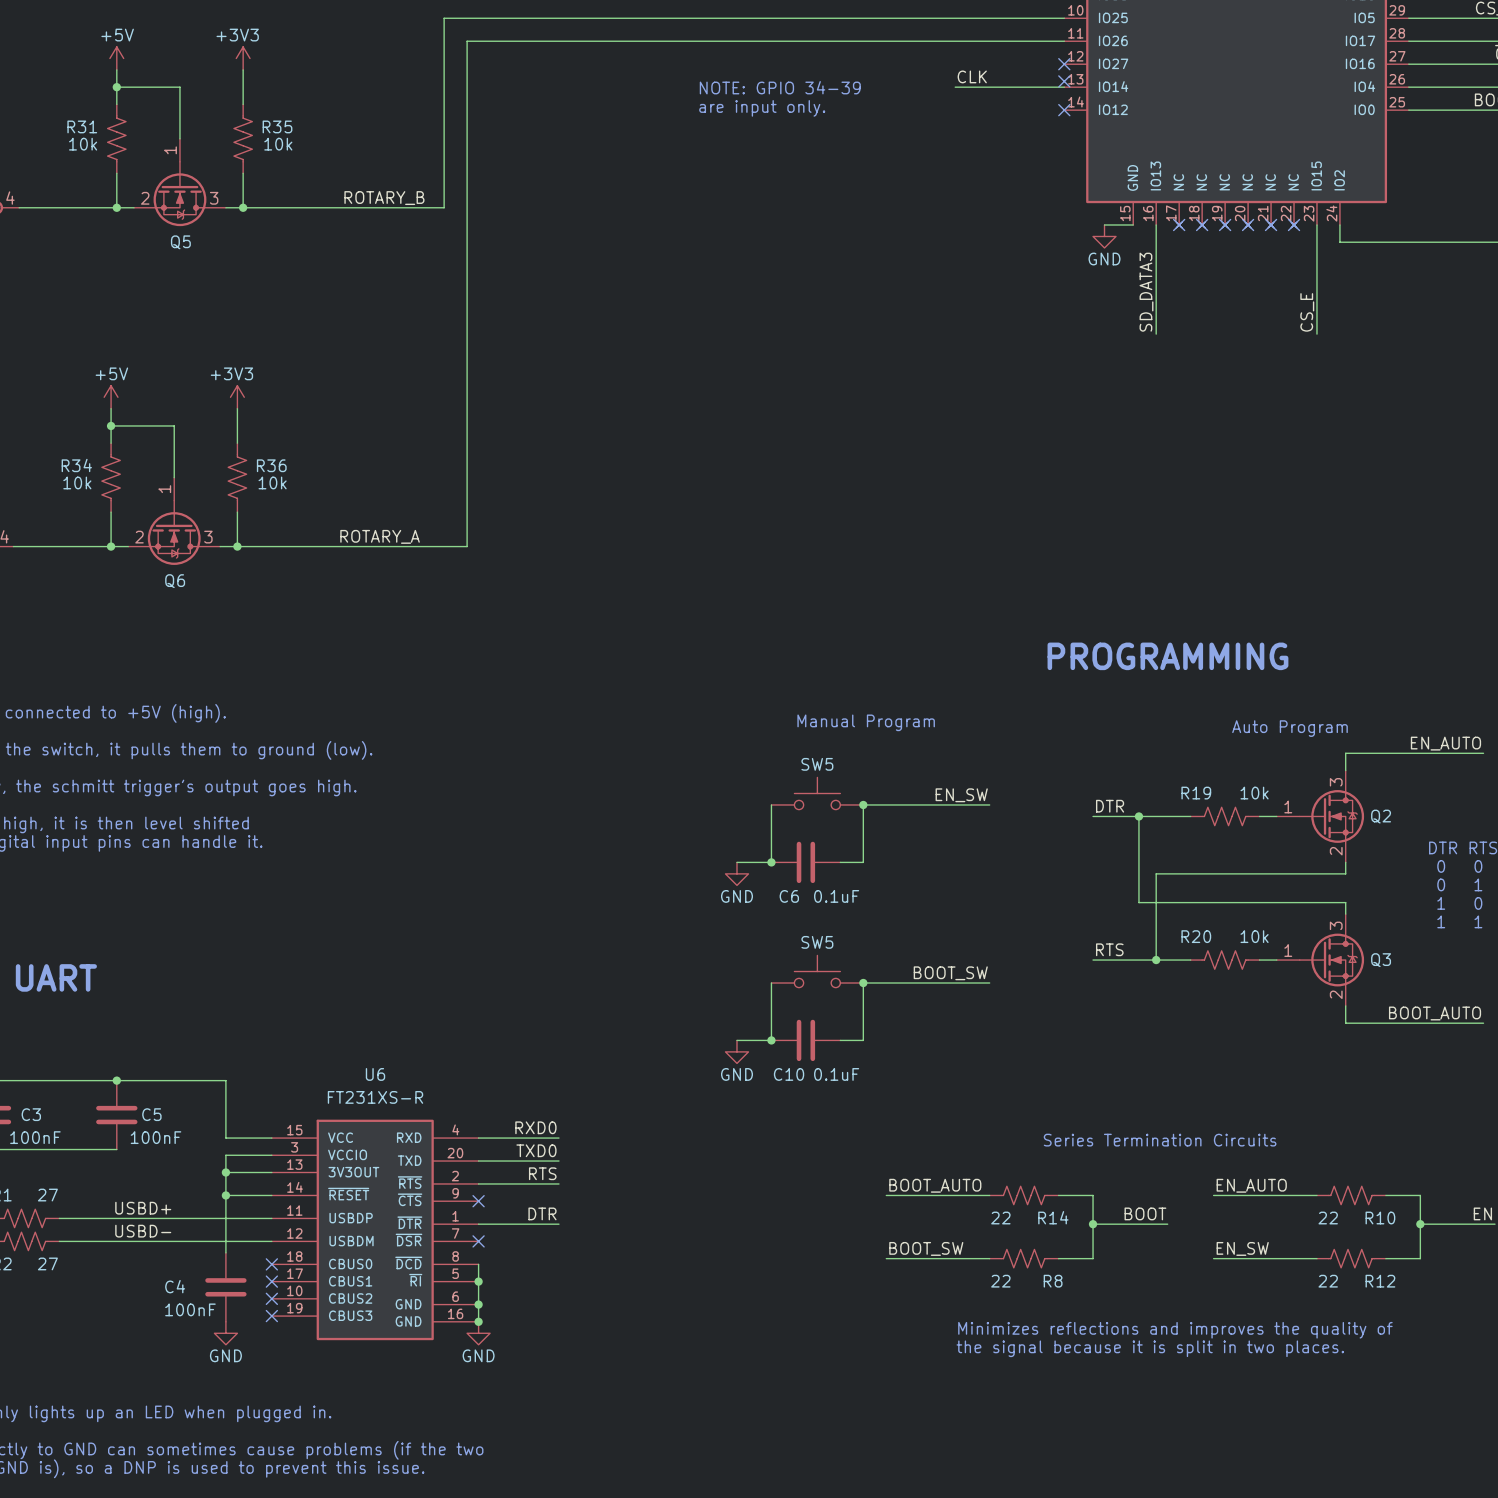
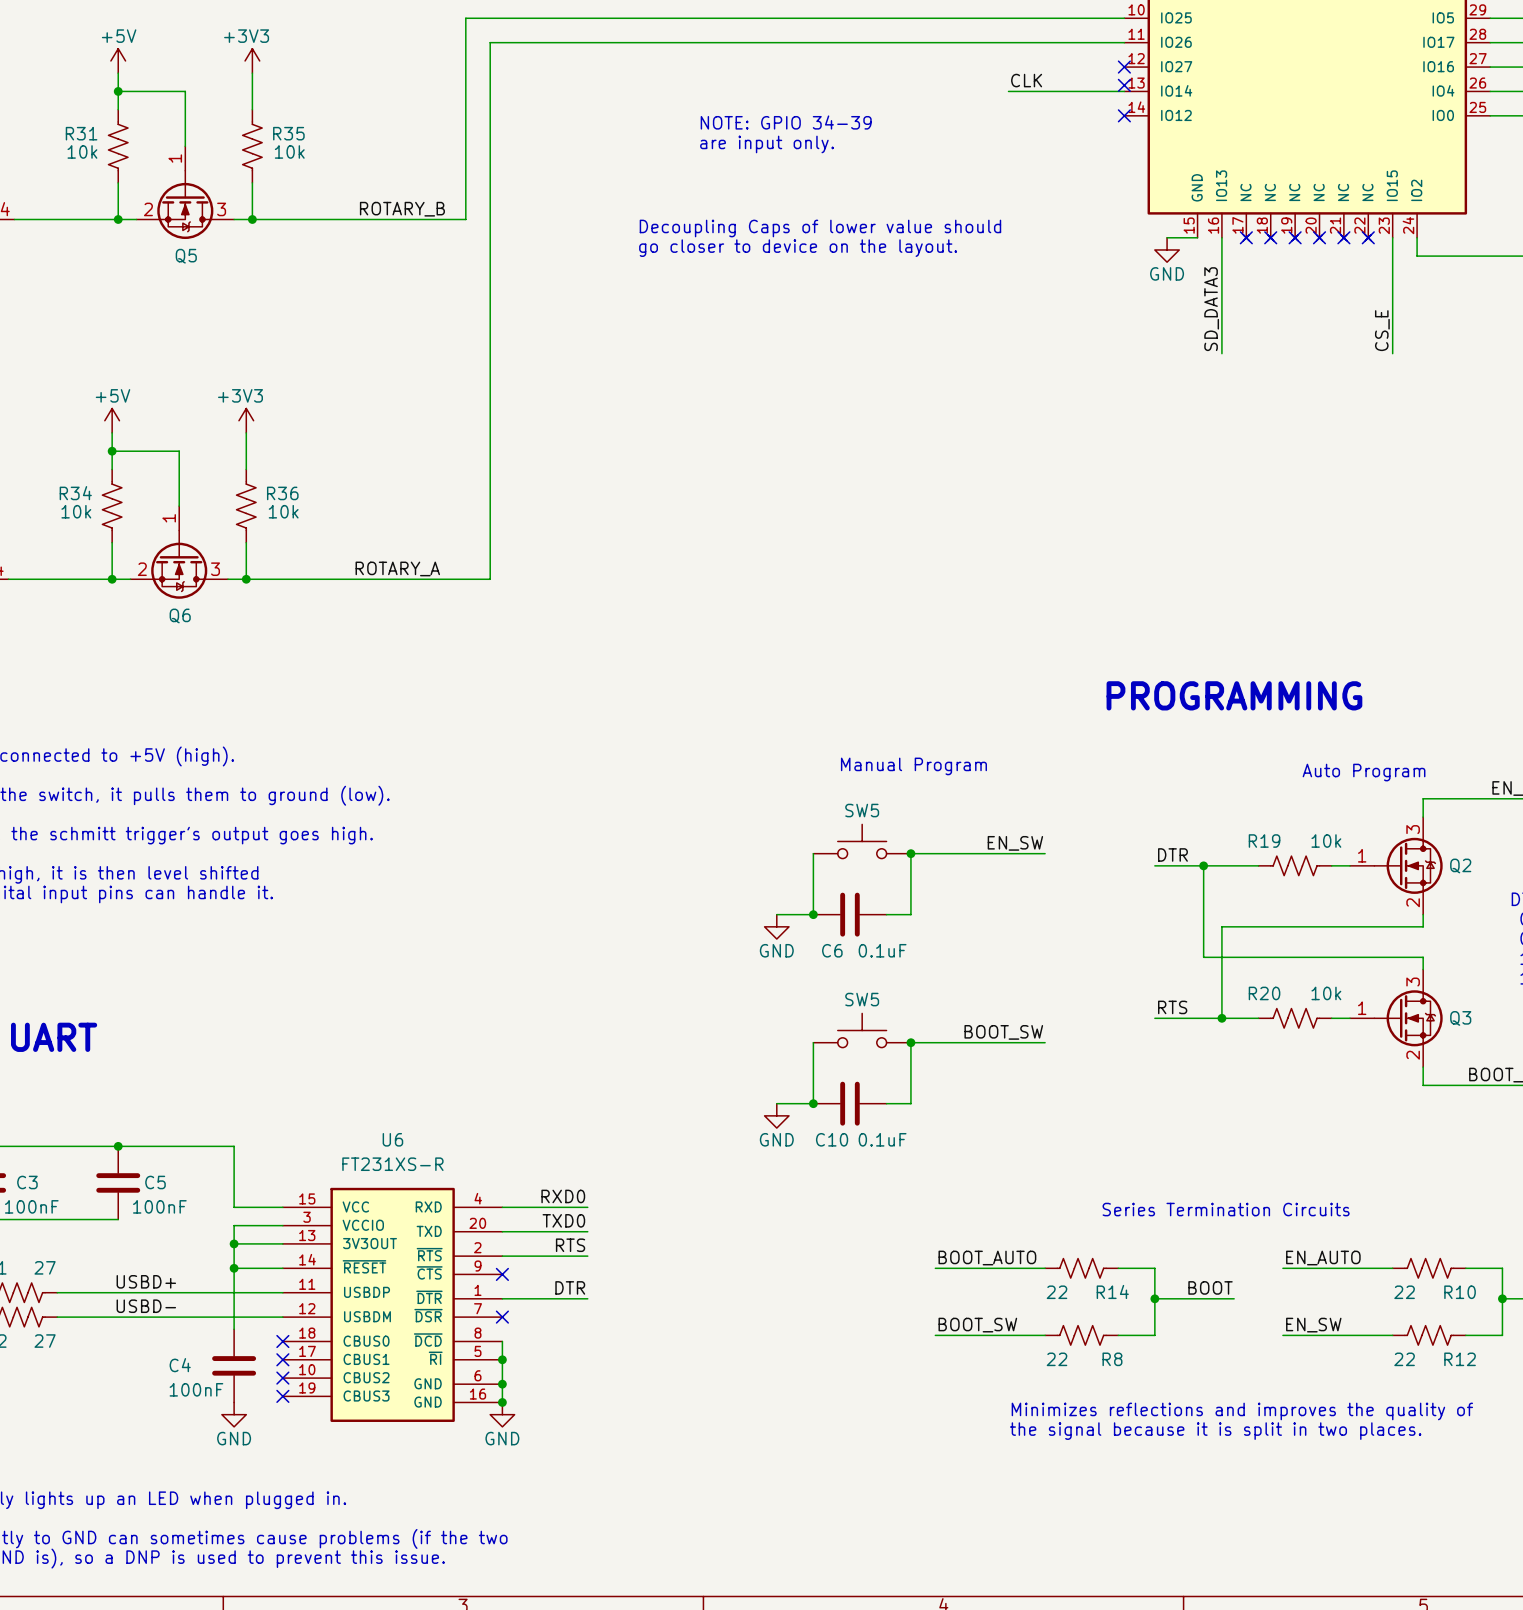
text position: NOTE: GPIO 34-39 (780, 87) -> NOTE: GPIO 34-39 (786, 122)
text position: are input only. (762, 108) -> are input only. (767, 144)
text: none -> Decoupling Caps of lower value should (820, 228)
text: none -> go closer to device on the layout. (798, 248)

